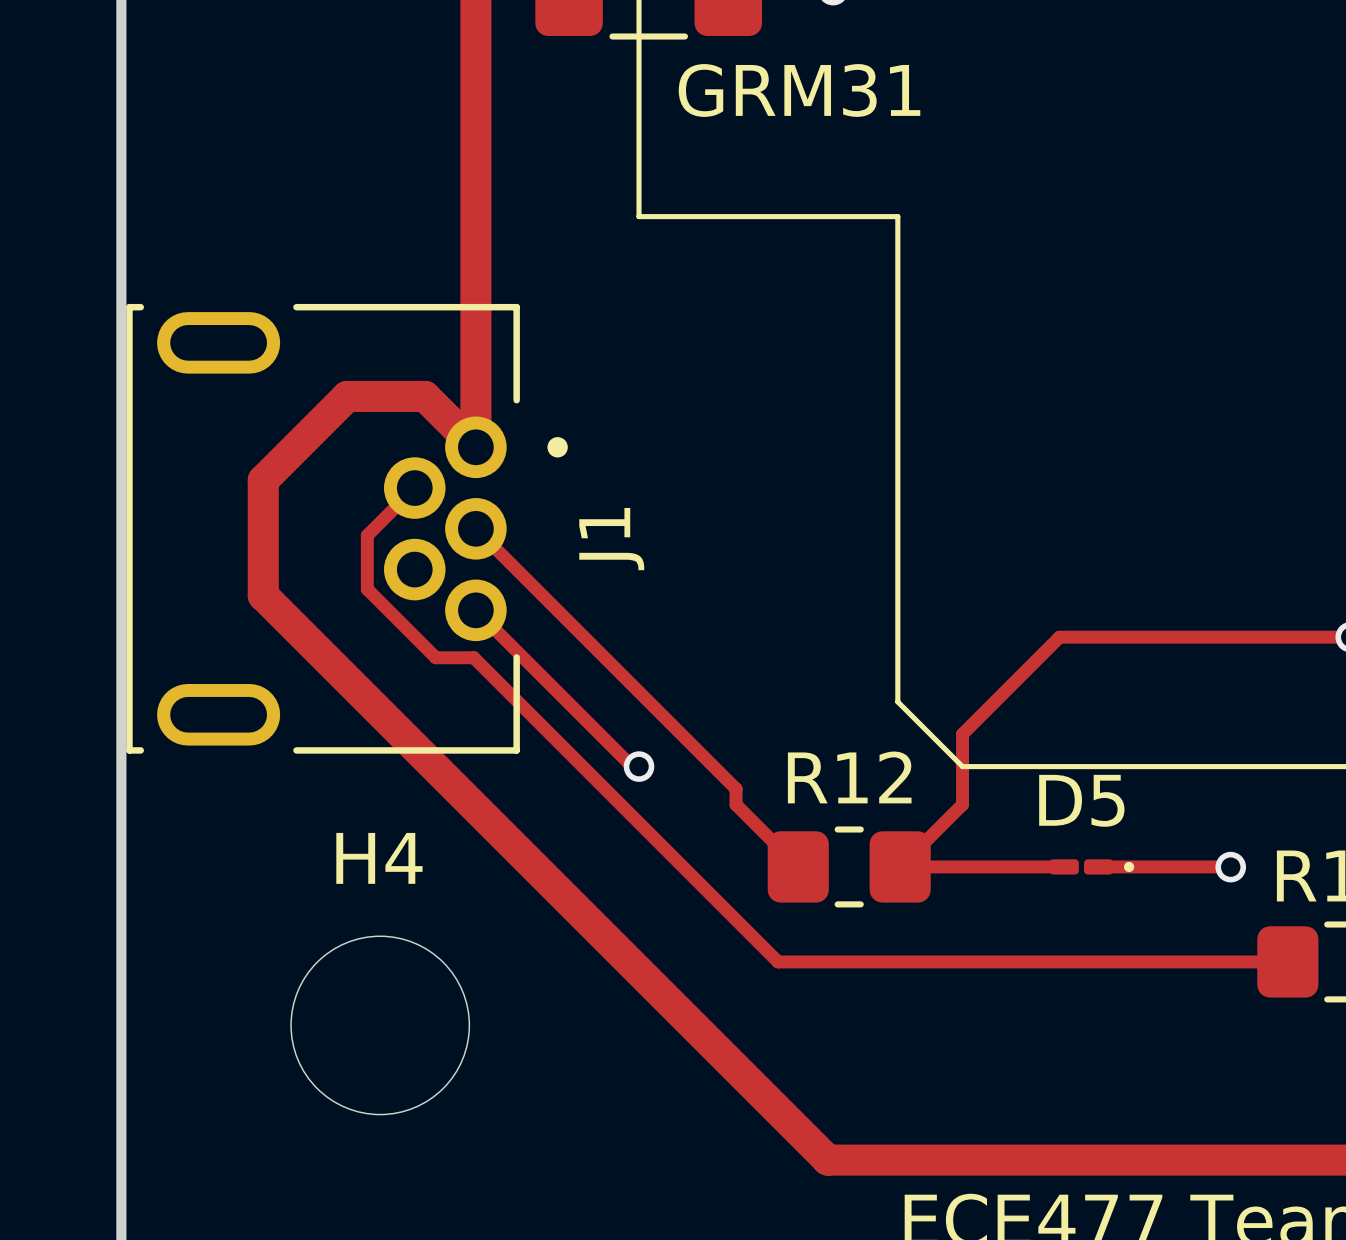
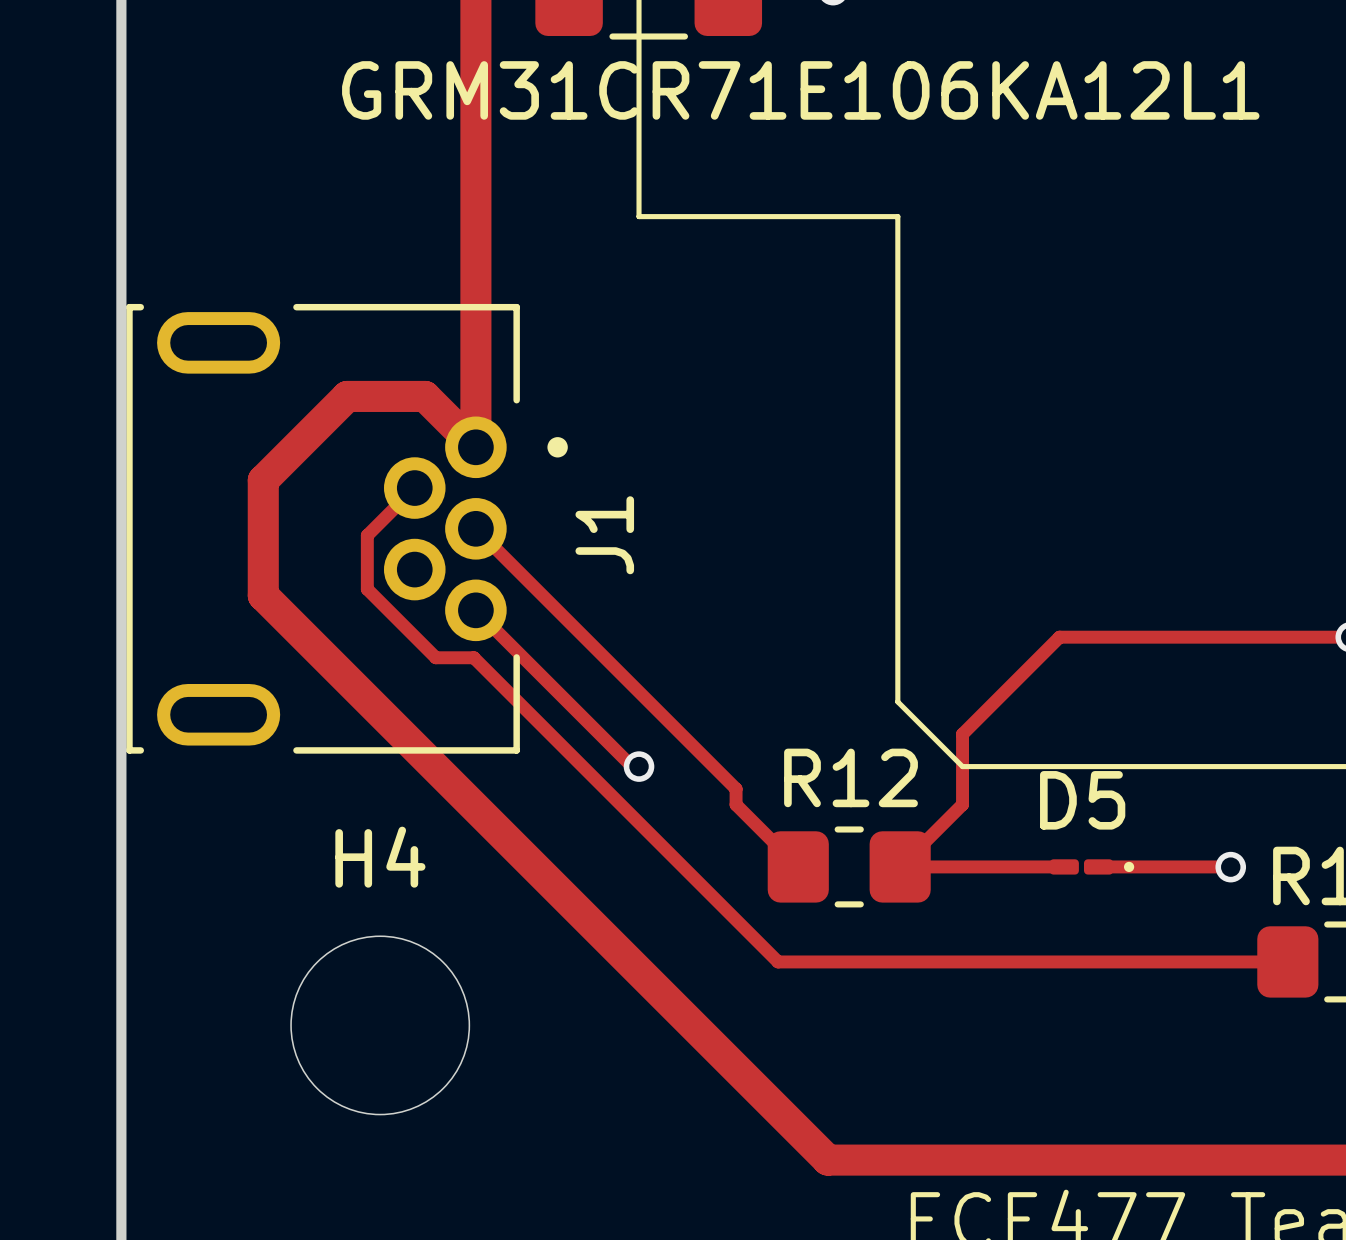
GRM31 name: GRM31 (799, 90) -> GRM31CR71E106KA12L1 (800, 90)

